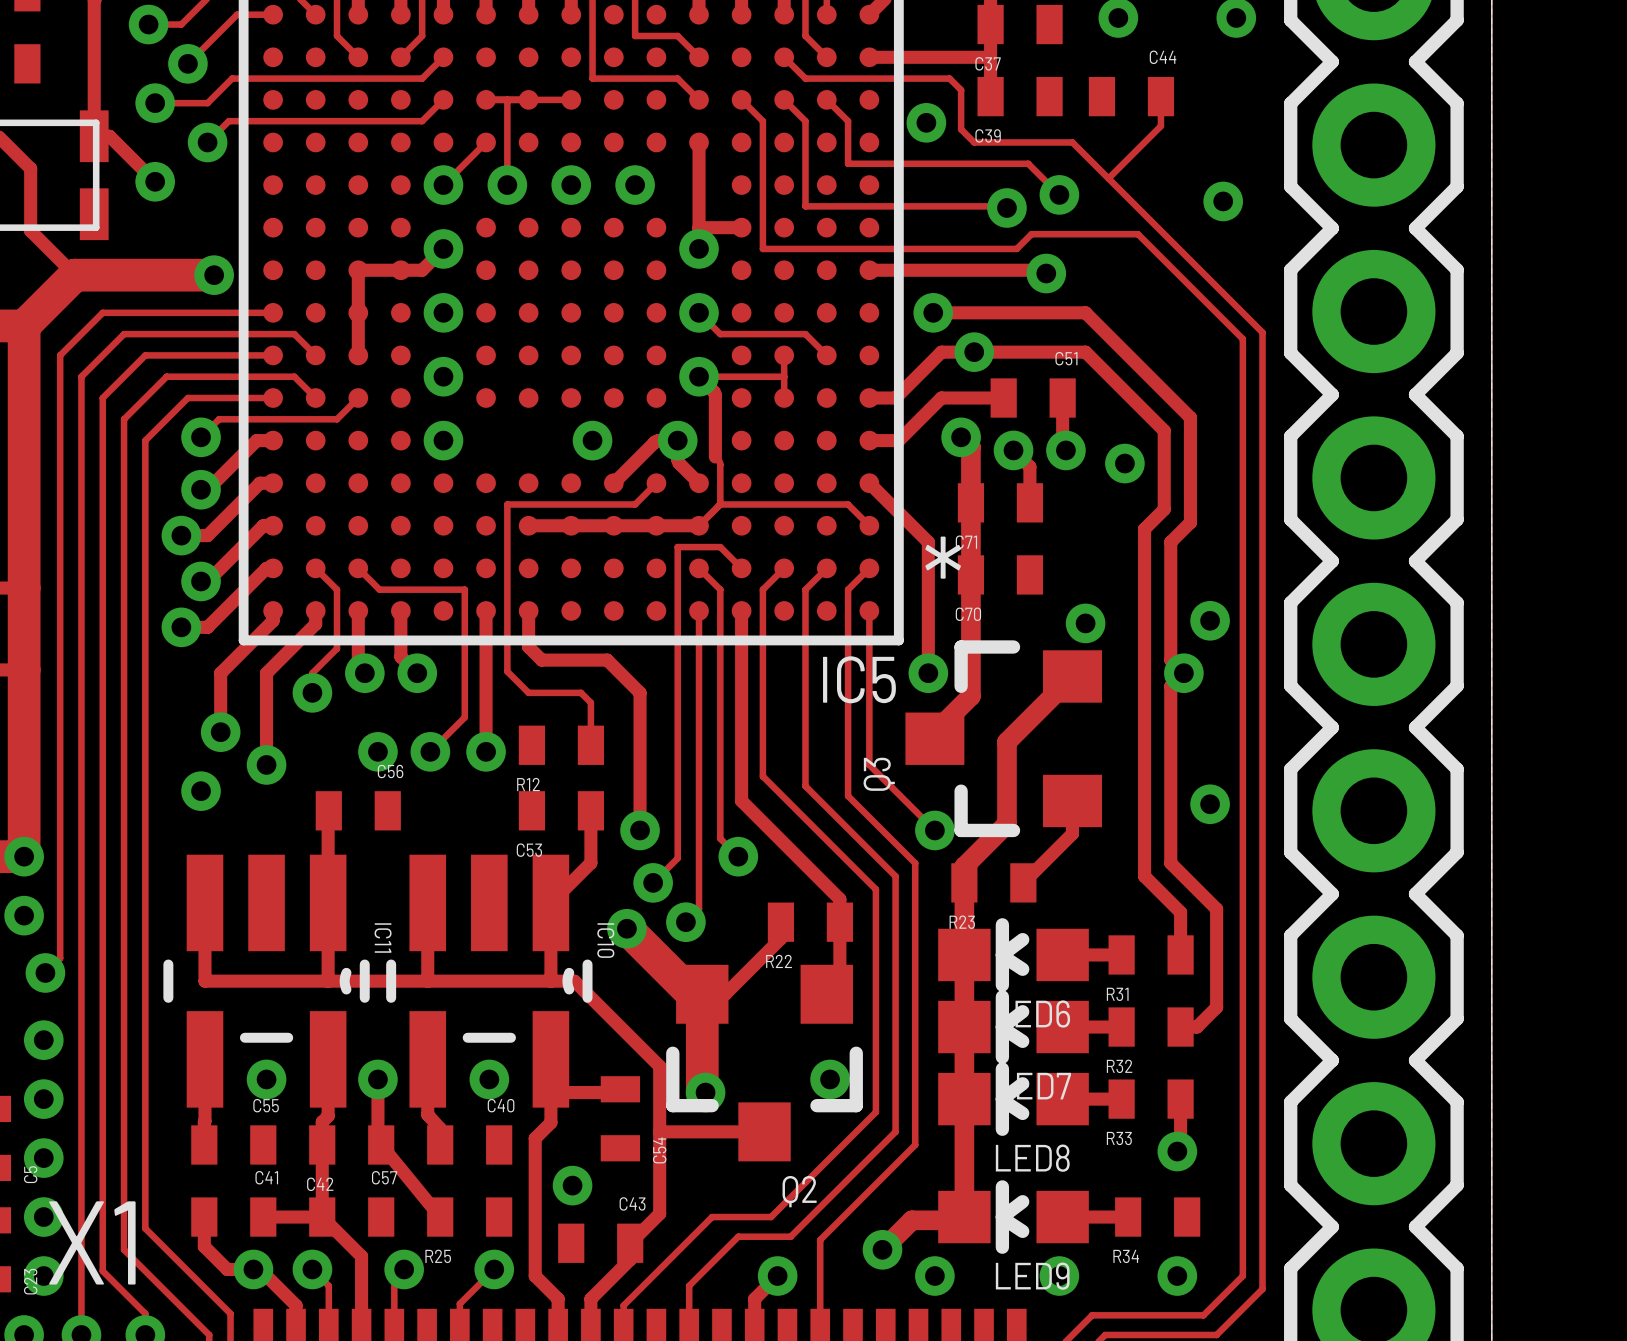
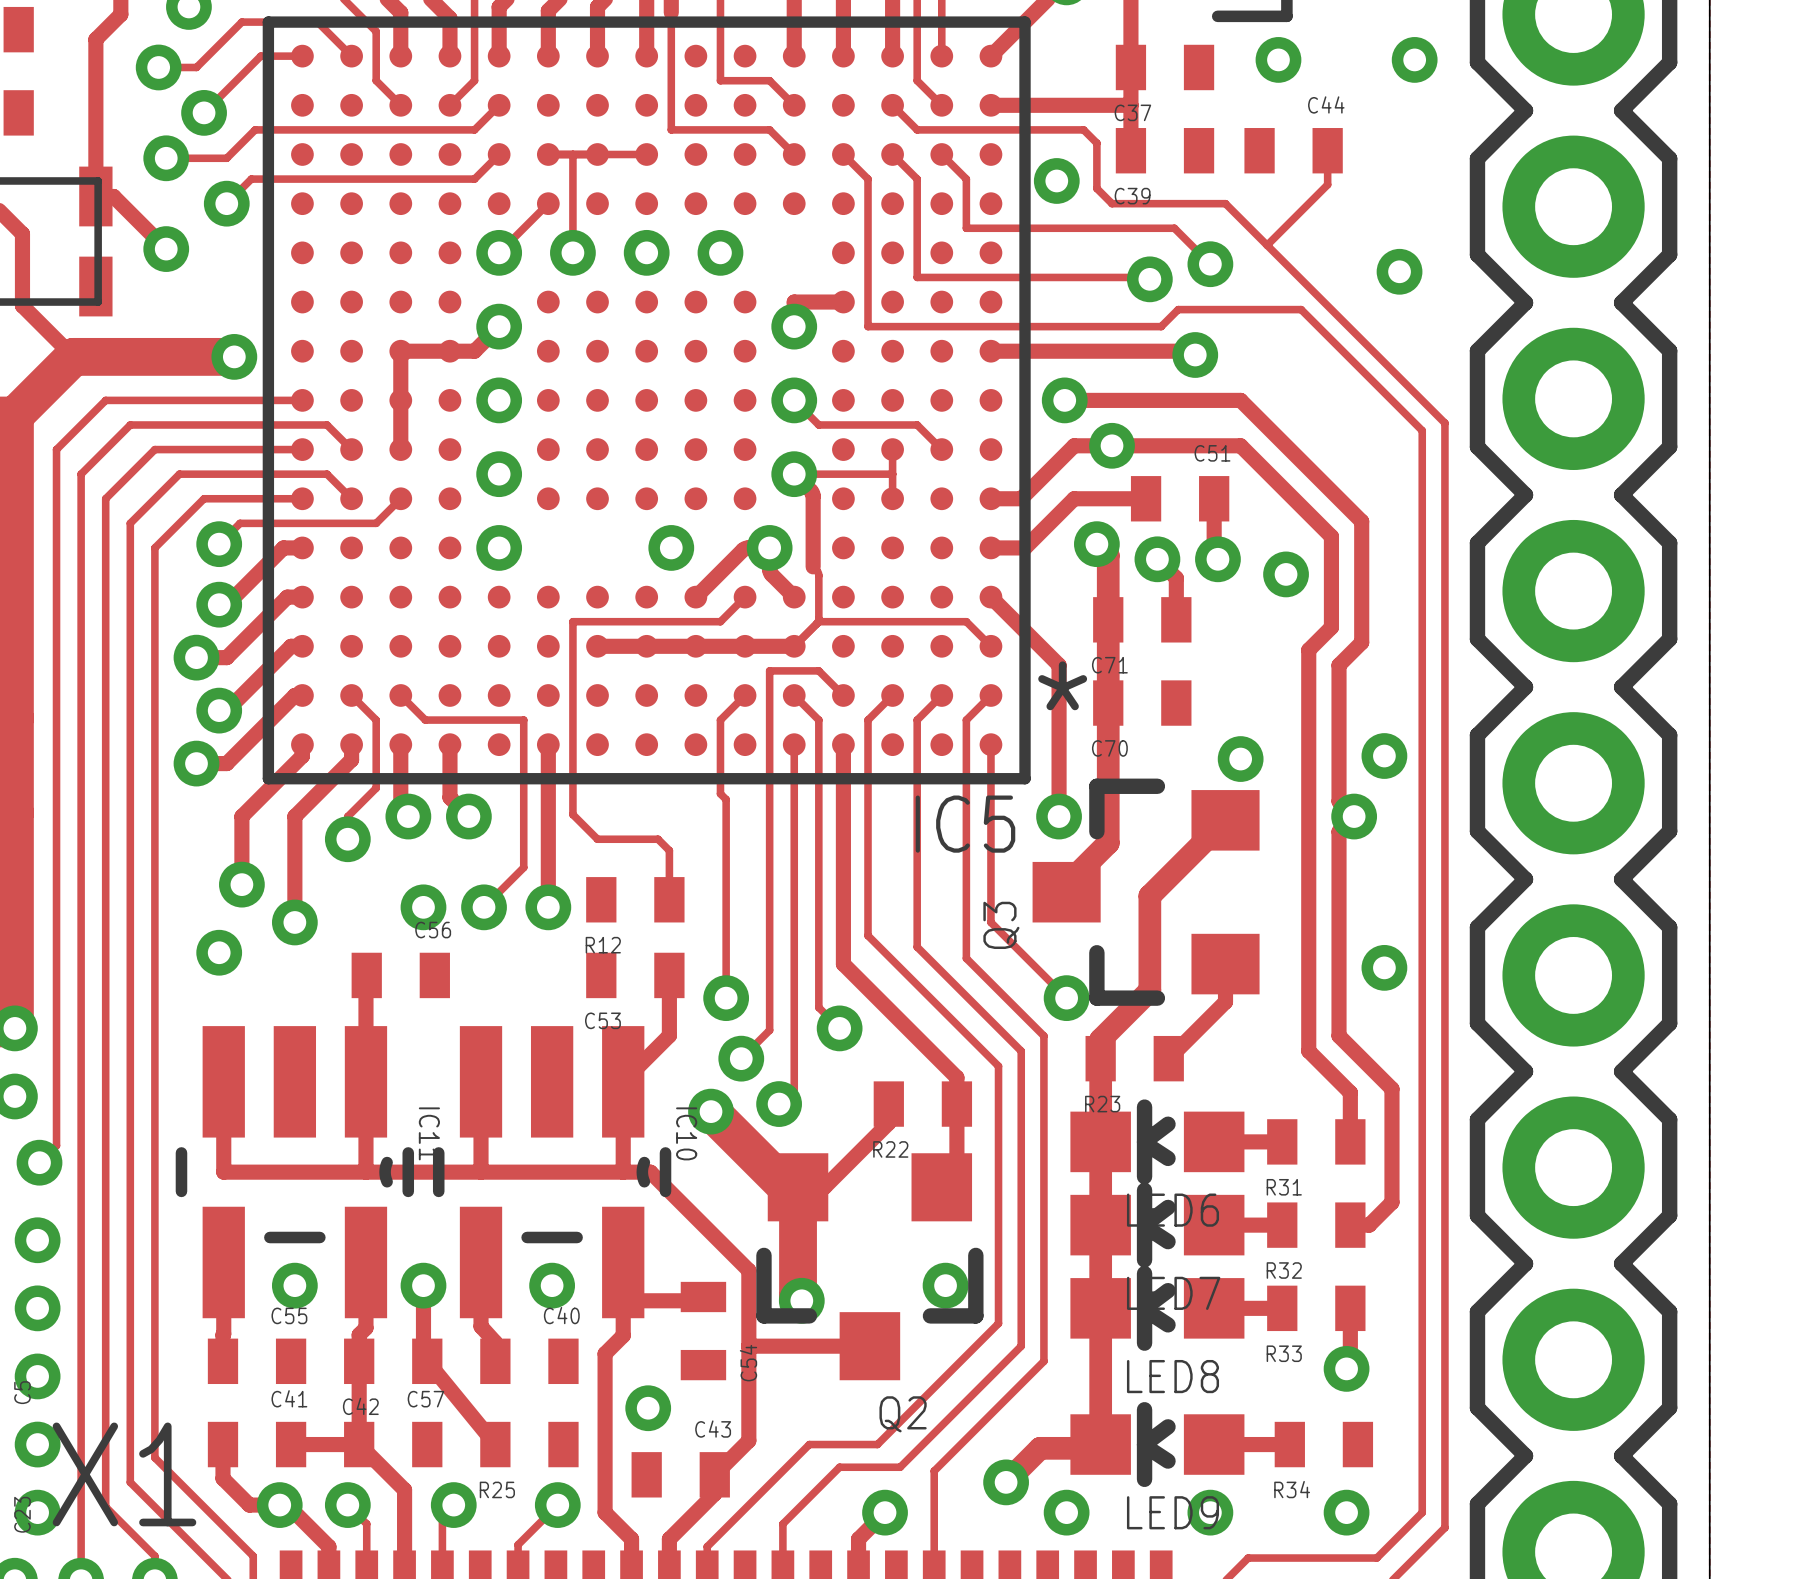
track: (699, 142) (699, 227) -> none
track: (528, 610) (528, 647) (541, 660) (607, 660) (640, 692) -> (745, 695) (720, 720) (720, 793) (726, 799) (726, 839)
track width: thick (640, 692) (640, 830) -> thin (726, 839) (726, 998)

